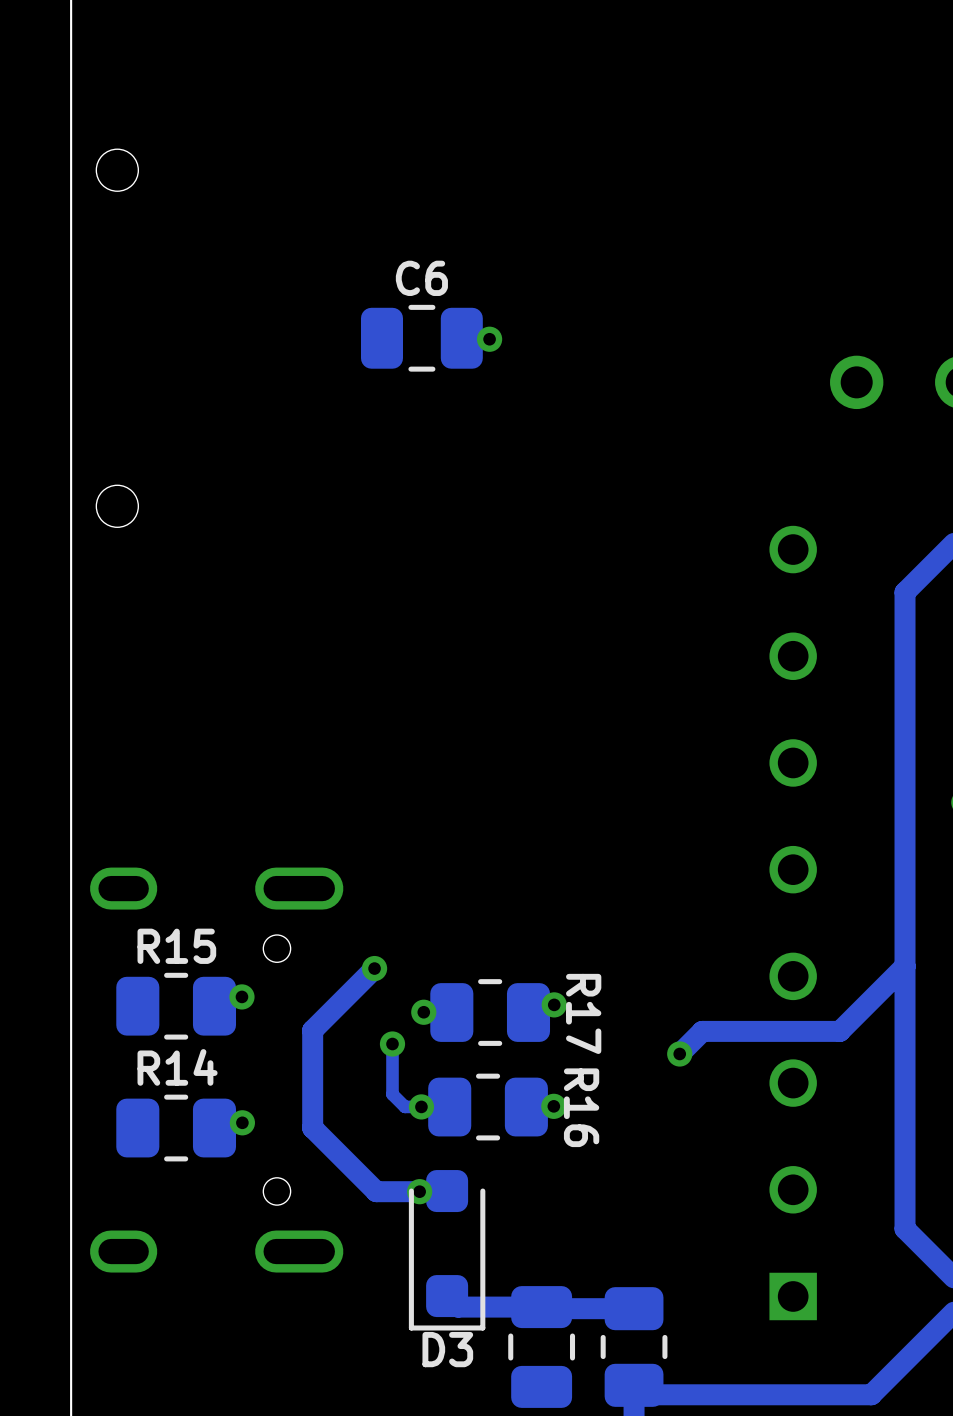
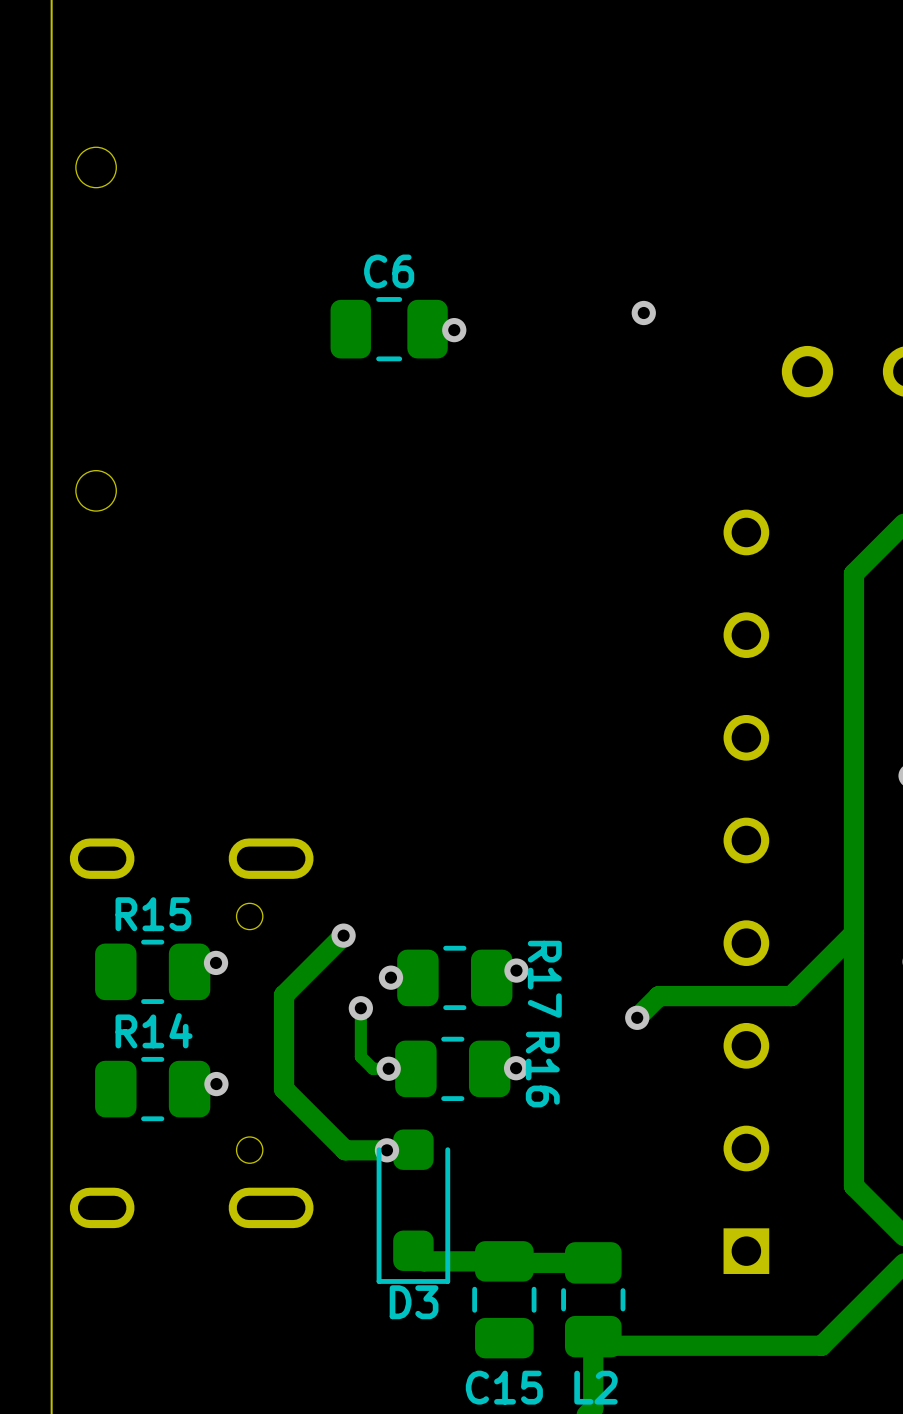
via: none -> (643, 312)

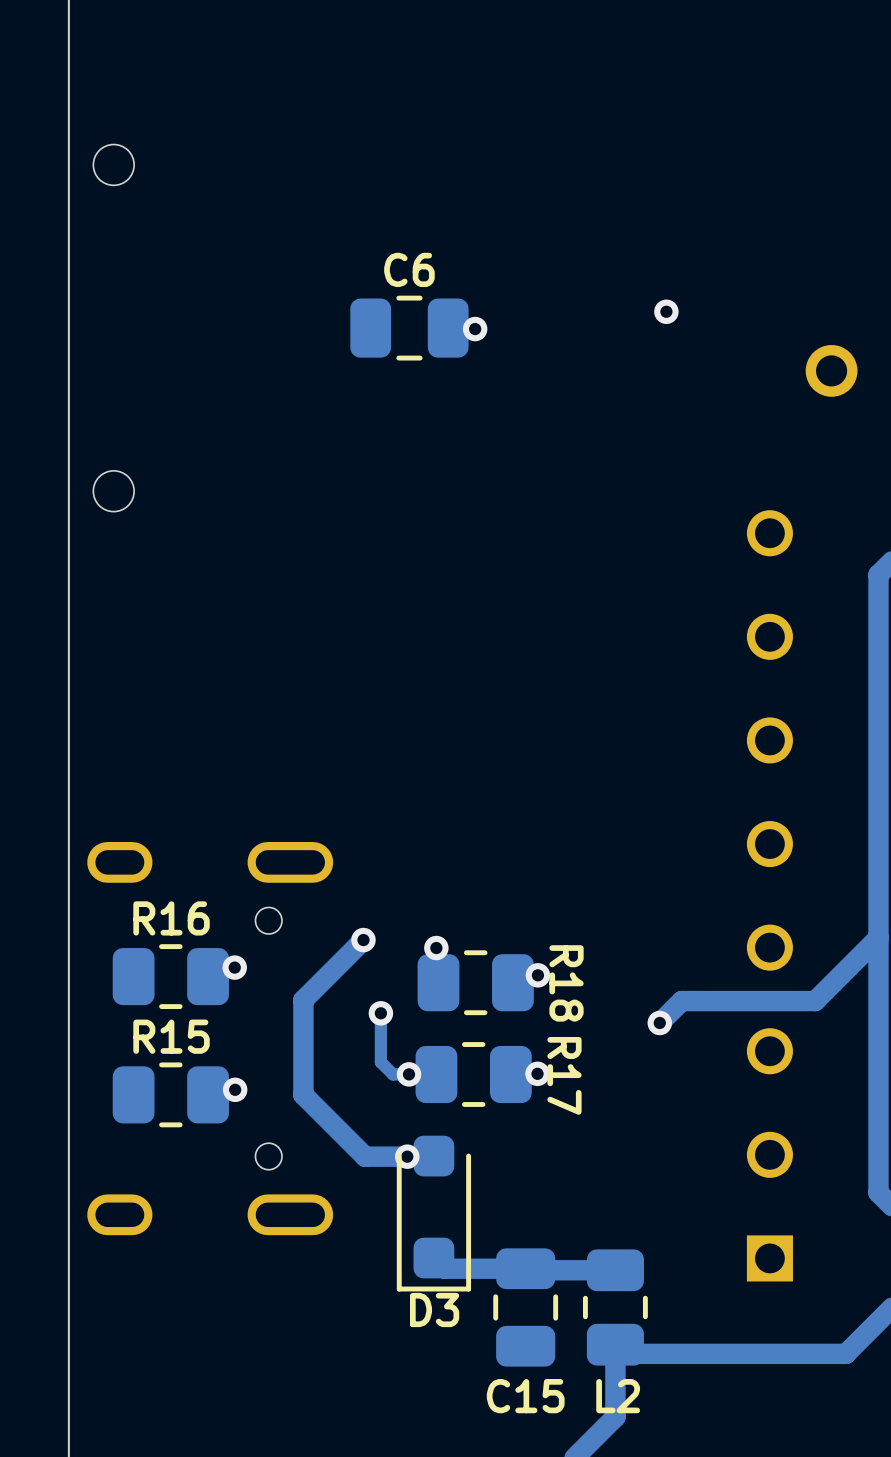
R15 name: R15 (153, 914) -> R16 (171, 918)
via position: (390, 977) -> (436, 948)
R17 name: R17 (544, 979) -> R18 (566, 983)
R14 name: R14 (154, 1030) -> R15 (171, 1036)
R16 name: R16 (542, 1069) -> R17 (564, 1075)

